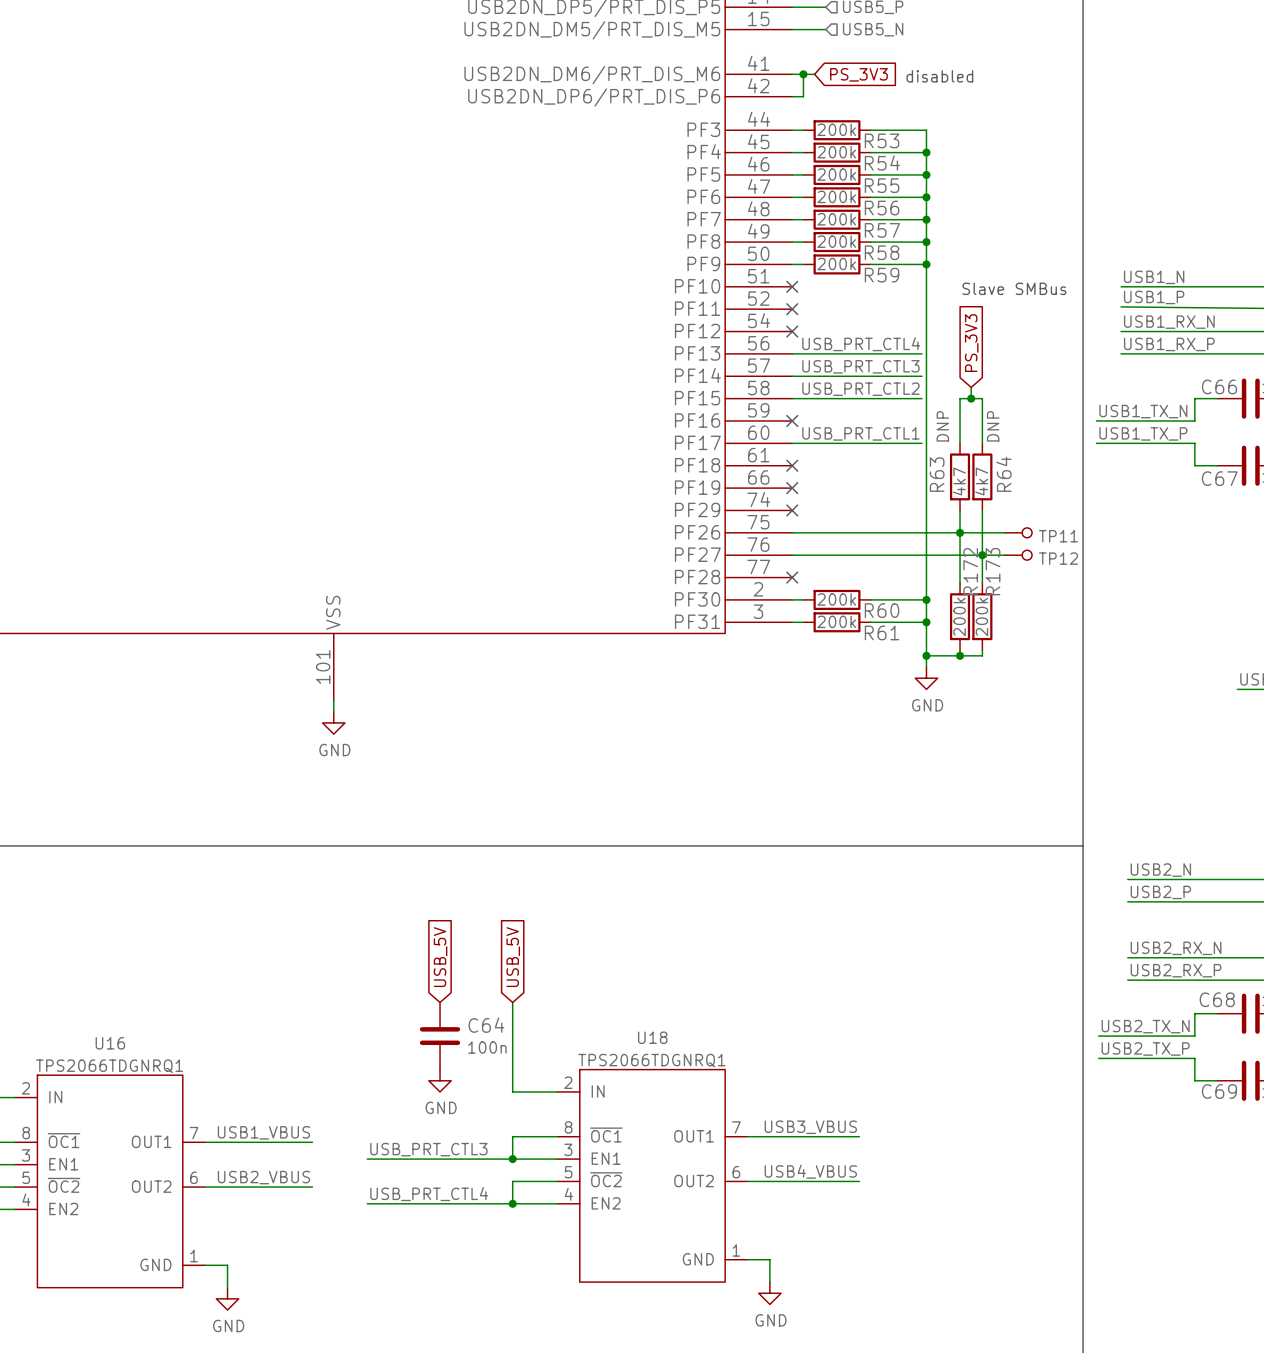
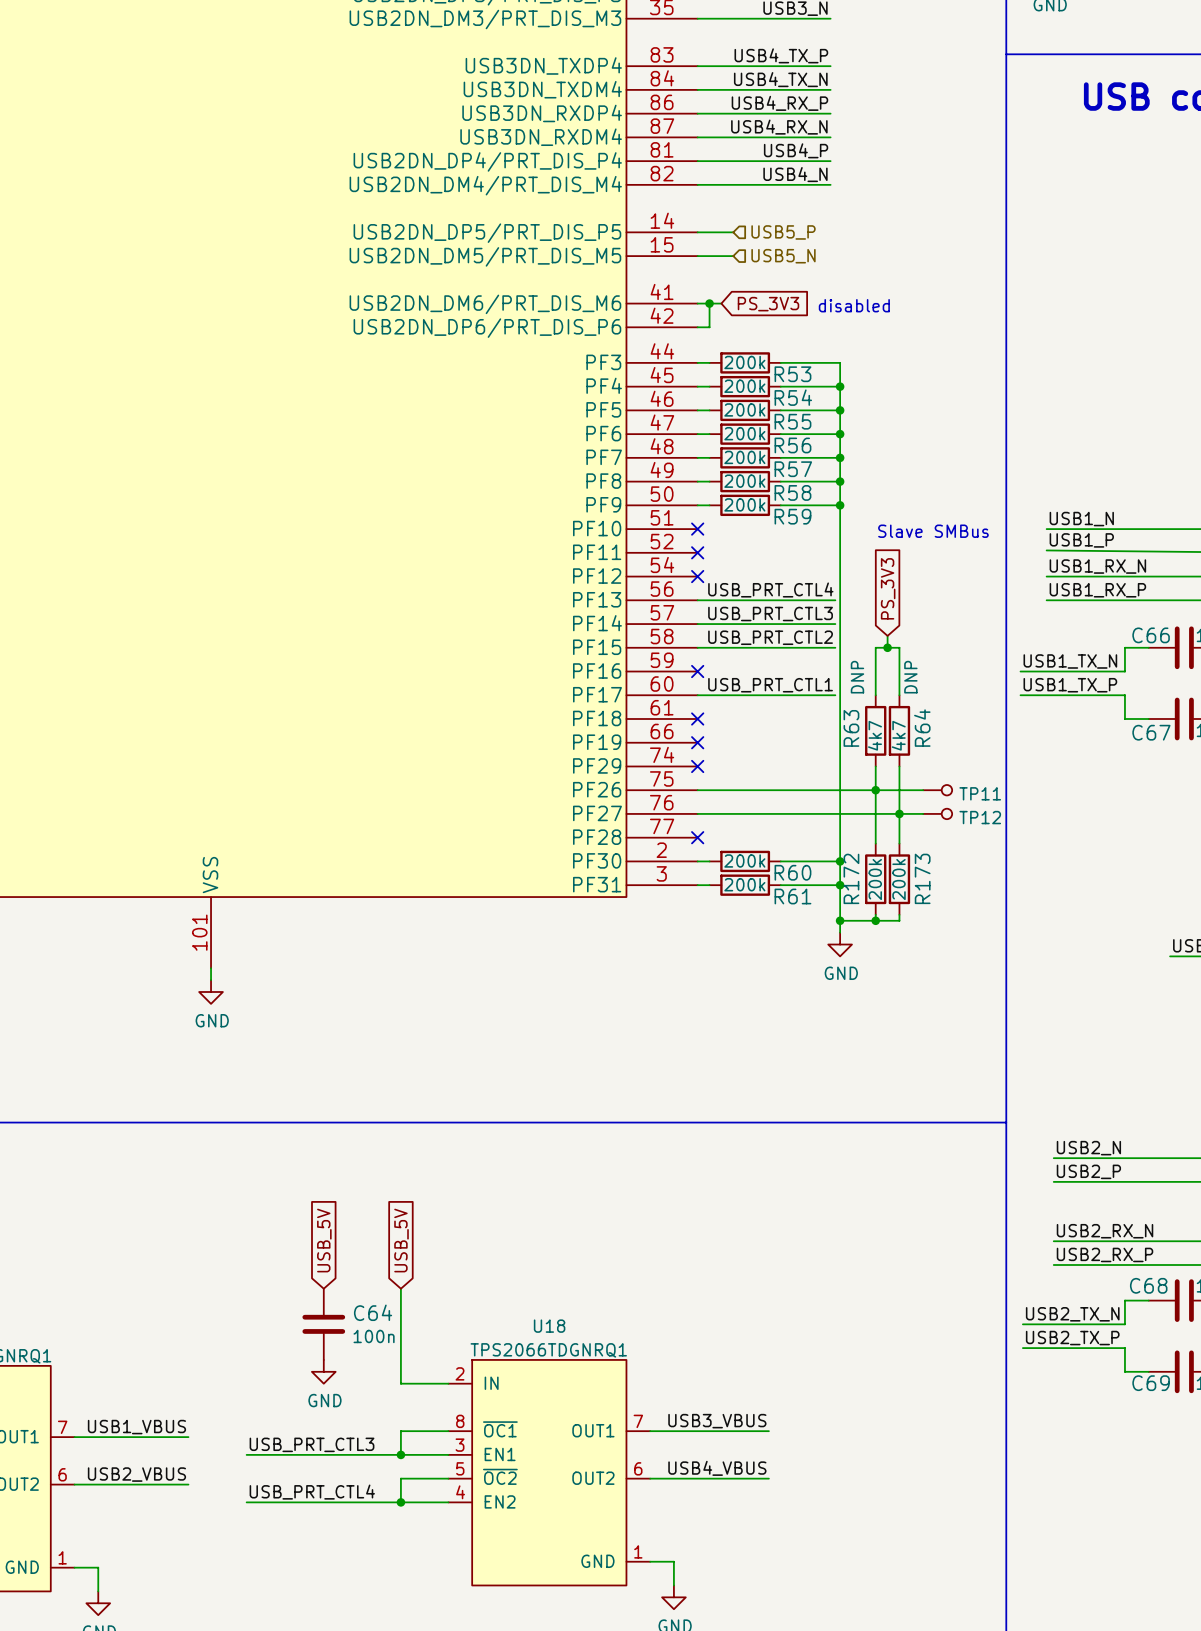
R172 name position: R172 (970, 571) -> R172 (851, 878)
R173 name position: R173 (993, 571) -> R173 (922, 878)

